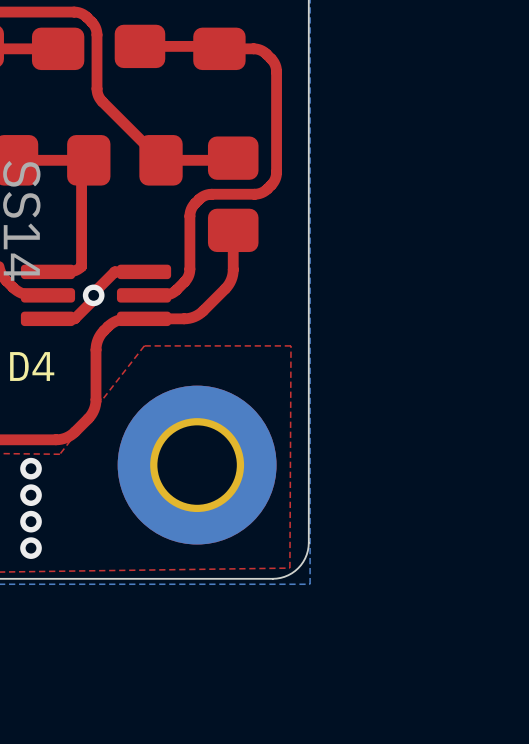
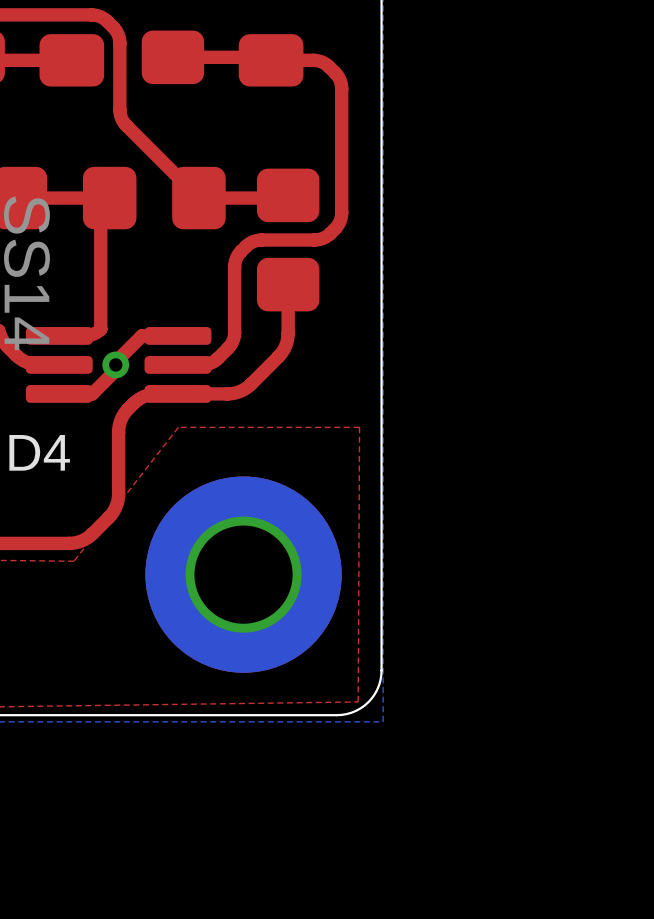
via: (31, 468) -> none
via: (31, 495) -> none
via: (31, 521) -> none
via: (31, 548) -> none

